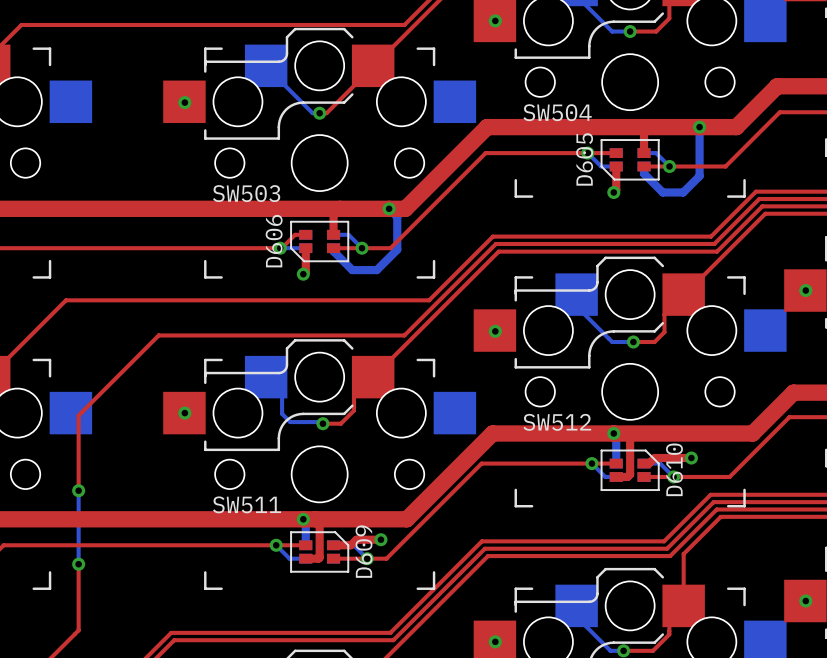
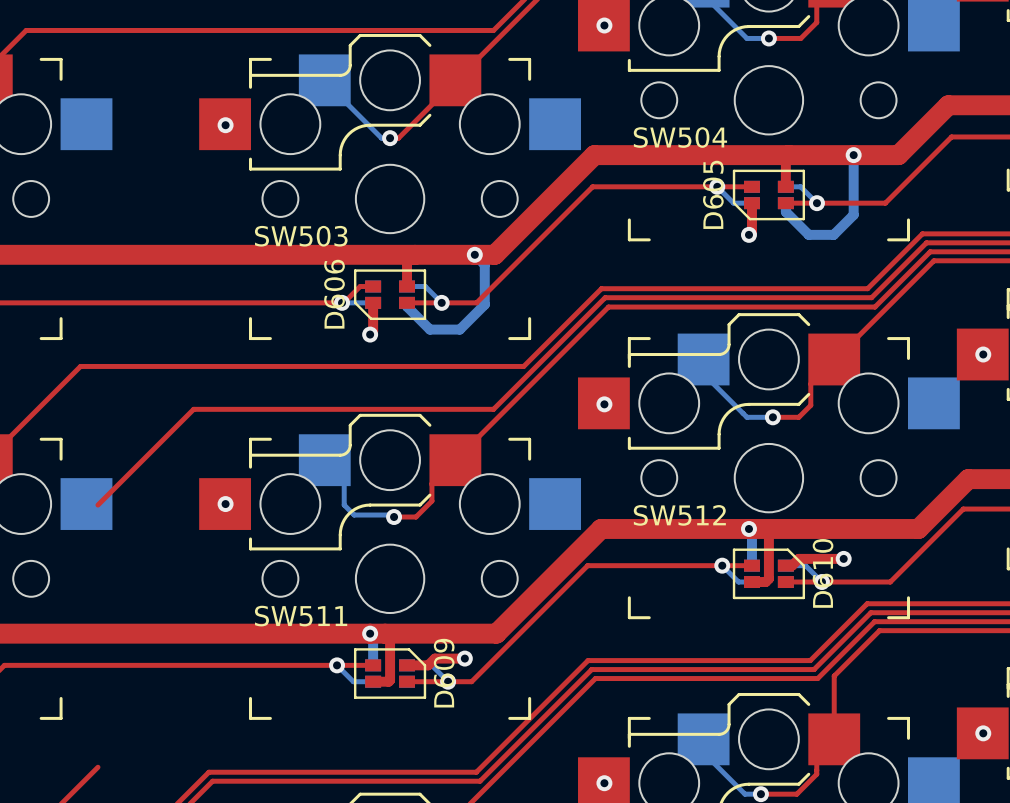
top track: (80, 413) (78, 415) (78, 490) -> none
bottom track: (78, 490) (78, 564) -> none
via: (78, 490) -> none
top track: (78, 564) (78, 630) -> (97, 767) (95, 769)
via: (78, 564) -> none

